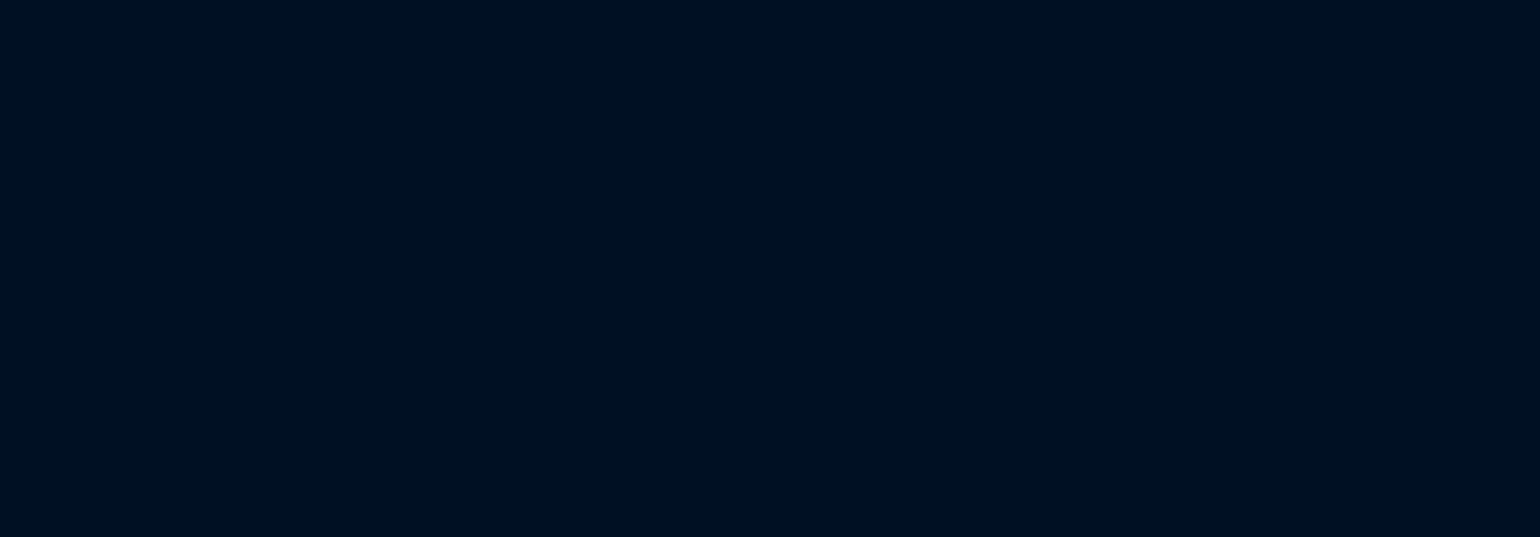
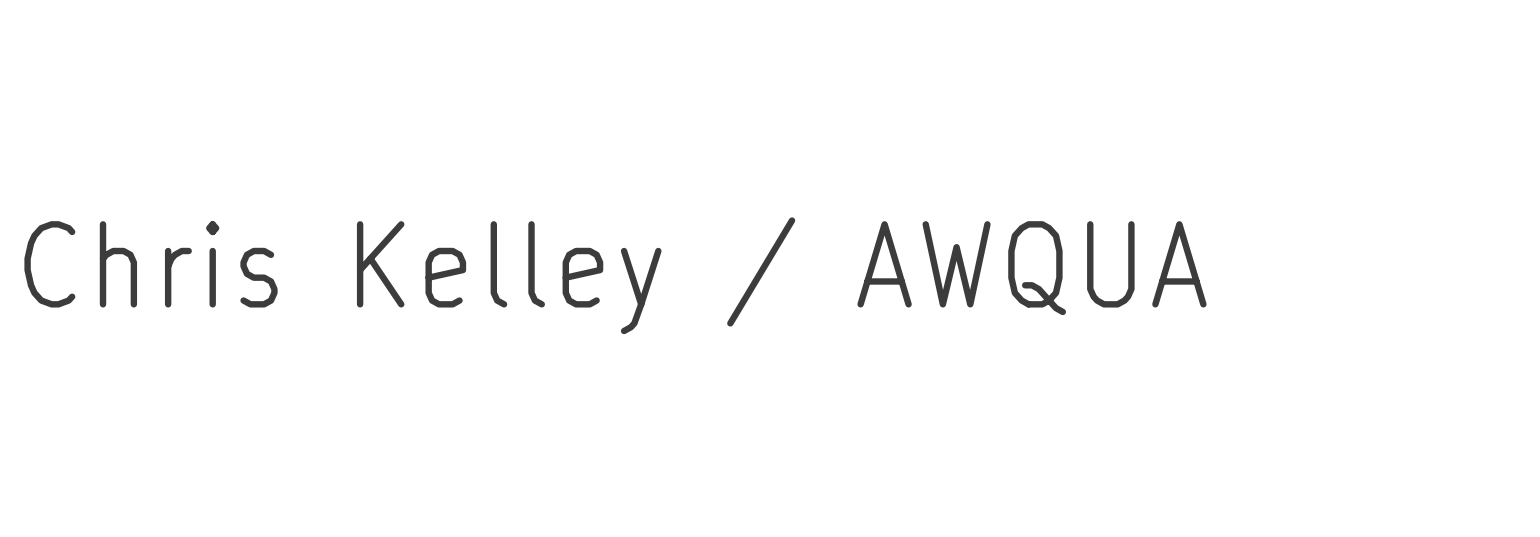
text: none -> Chris Kelley / AWQUA (615, 275)

